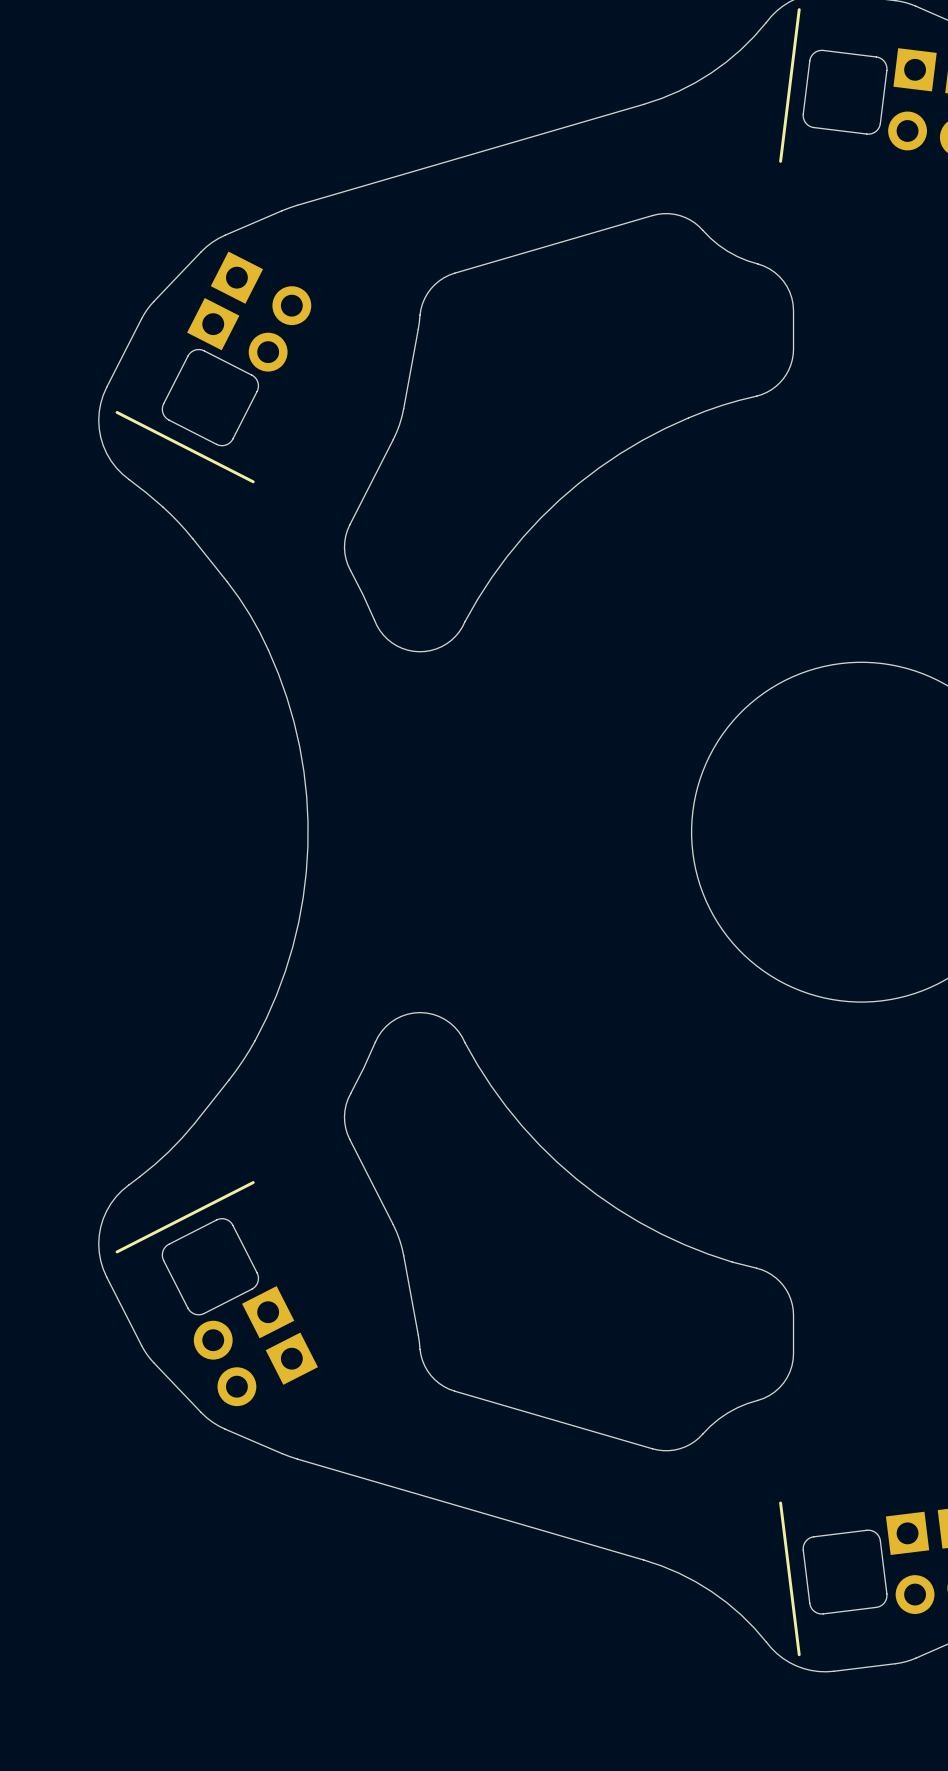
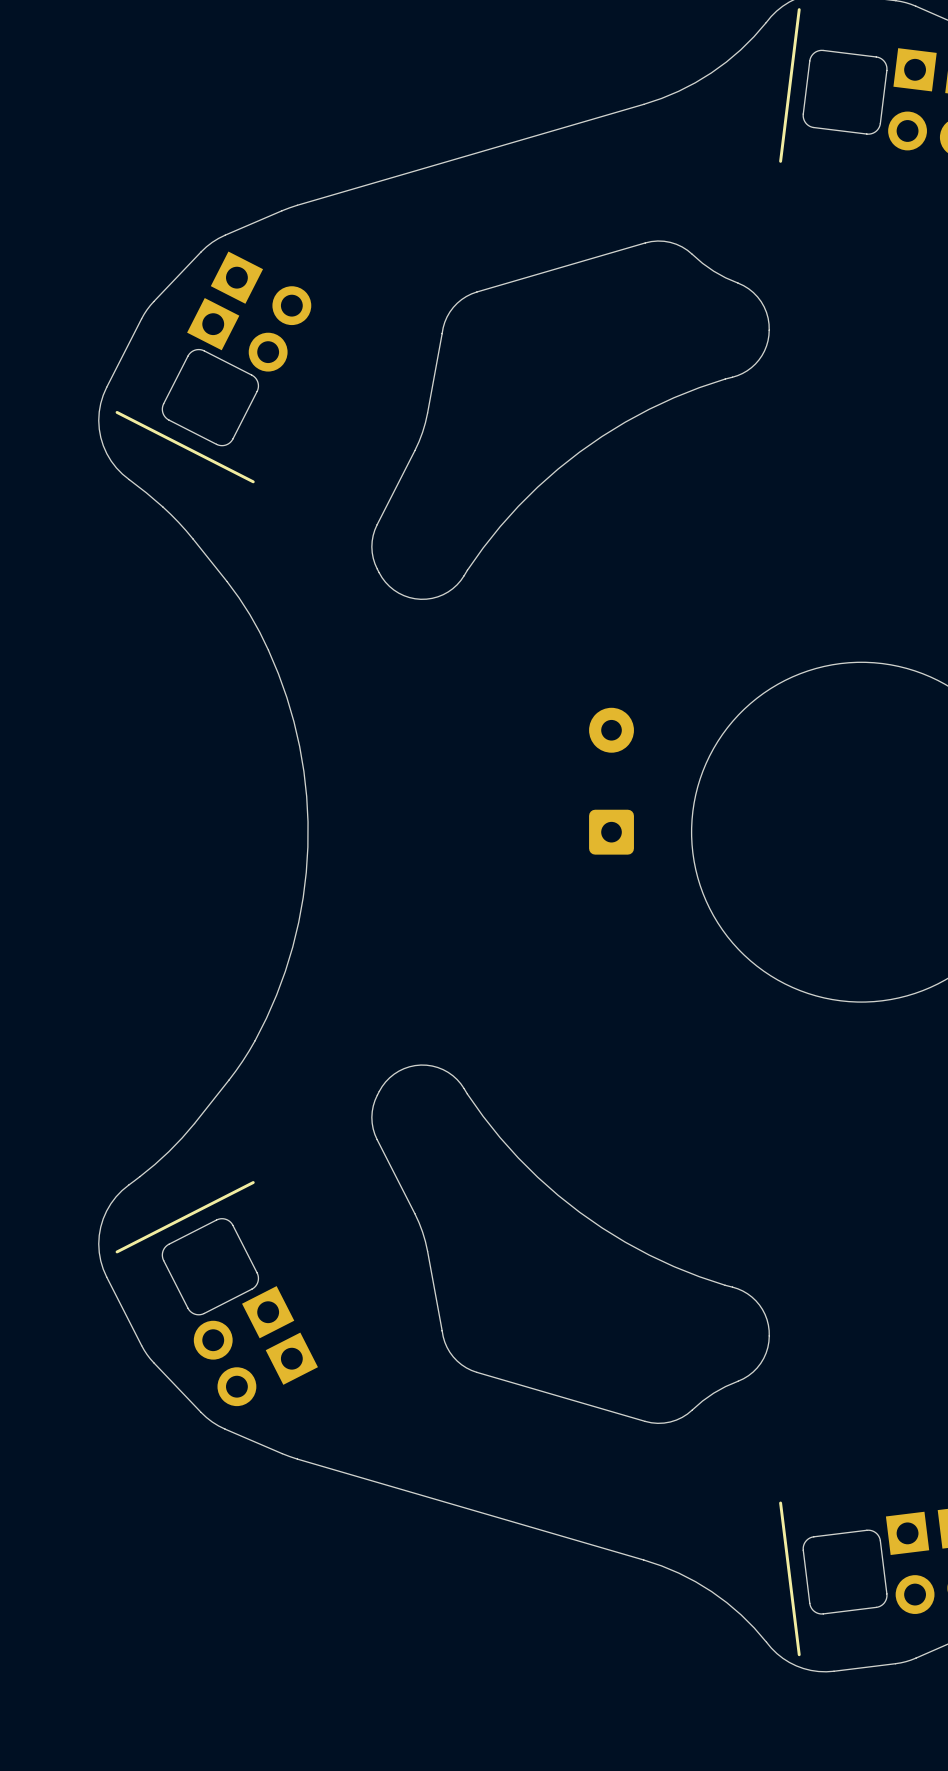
board edge: (652, 215) (454, 273) (439, 280) (427, 293) (420, 309) (399, 424) (349, 524) (344, 541) (348, 565) (376, 625) (383, 635) (396, 645) (413, 651) (425, 651) (436, 648) (451, 640) (459, 631) (491, 577) (523, 537) (559, 500) (599, 467) (642, 440) (688, 417) (722, 405) (766, 392) (779, 382) (786, 374) (793, 354) (793, 310) (789, 292) (783, 281) (769, 268) (727, 251) (690, 219) (669, 213) (652, 215) -> (442, 333) (449, 311) (461, 299) (471, 293) (645, 242) (657, 241) (670, 242) (682, 246) (713, 271) (748, 288) (764, 306) (769, 330) (764, 350) (758, 360) (747, 370) (699, 387) (649, 409) (625, 422) (579, 452) (558, 469) (518, 506) (483, 548) (457, 584) (443, 594) (420, 599) (404, 595) (385, 582) (374, 563) (372, 541) (377, 524) (422, 432) (442, 333)
part: none -> (611, 781)
board edge: (375, 1042) (381, 1031) (390, 1022) (407, 1014) (426, 1013) (444, 1019) (458, 1031) (491, 1086) (522, 1126) (576, 1179) (617, 1209) (661, 1234) (708, 1254) (761, 1269) (775, 1277) (788, 1294) (793, 1309) (793, 1359) (789, 1372) (783, 1383) (769, 1395) (727, 1412) (690, 1444) (674, 1450) (663, 1450) (454, 1391) (439, 1383) (427, 1370) (420, 1355) (399, 1239) (345, 1128) (344, 1110) (348, 1098) (375, 1042) -> (442, 1331) (449, 1352) (461, 1364) (471, 1370) (645, 1421) (657, 1423) (670, 1421) (682, 1417) (713, 1393) (748, 1375) (763, 1358) (769, 1335) (765, 1314) (751, 1297) (737, 1288) (699, 1276) (649, 1255) (601, 1227) (579, 1212) (537, 1177) (518, 1158) (483, 1116) (457, 1079) (437, 1067) (420, 1065) (398, 1071) (385, 1081) (375, 1100) (372, 1123) (377, 1139) (422, 1232) (442, 1330)

